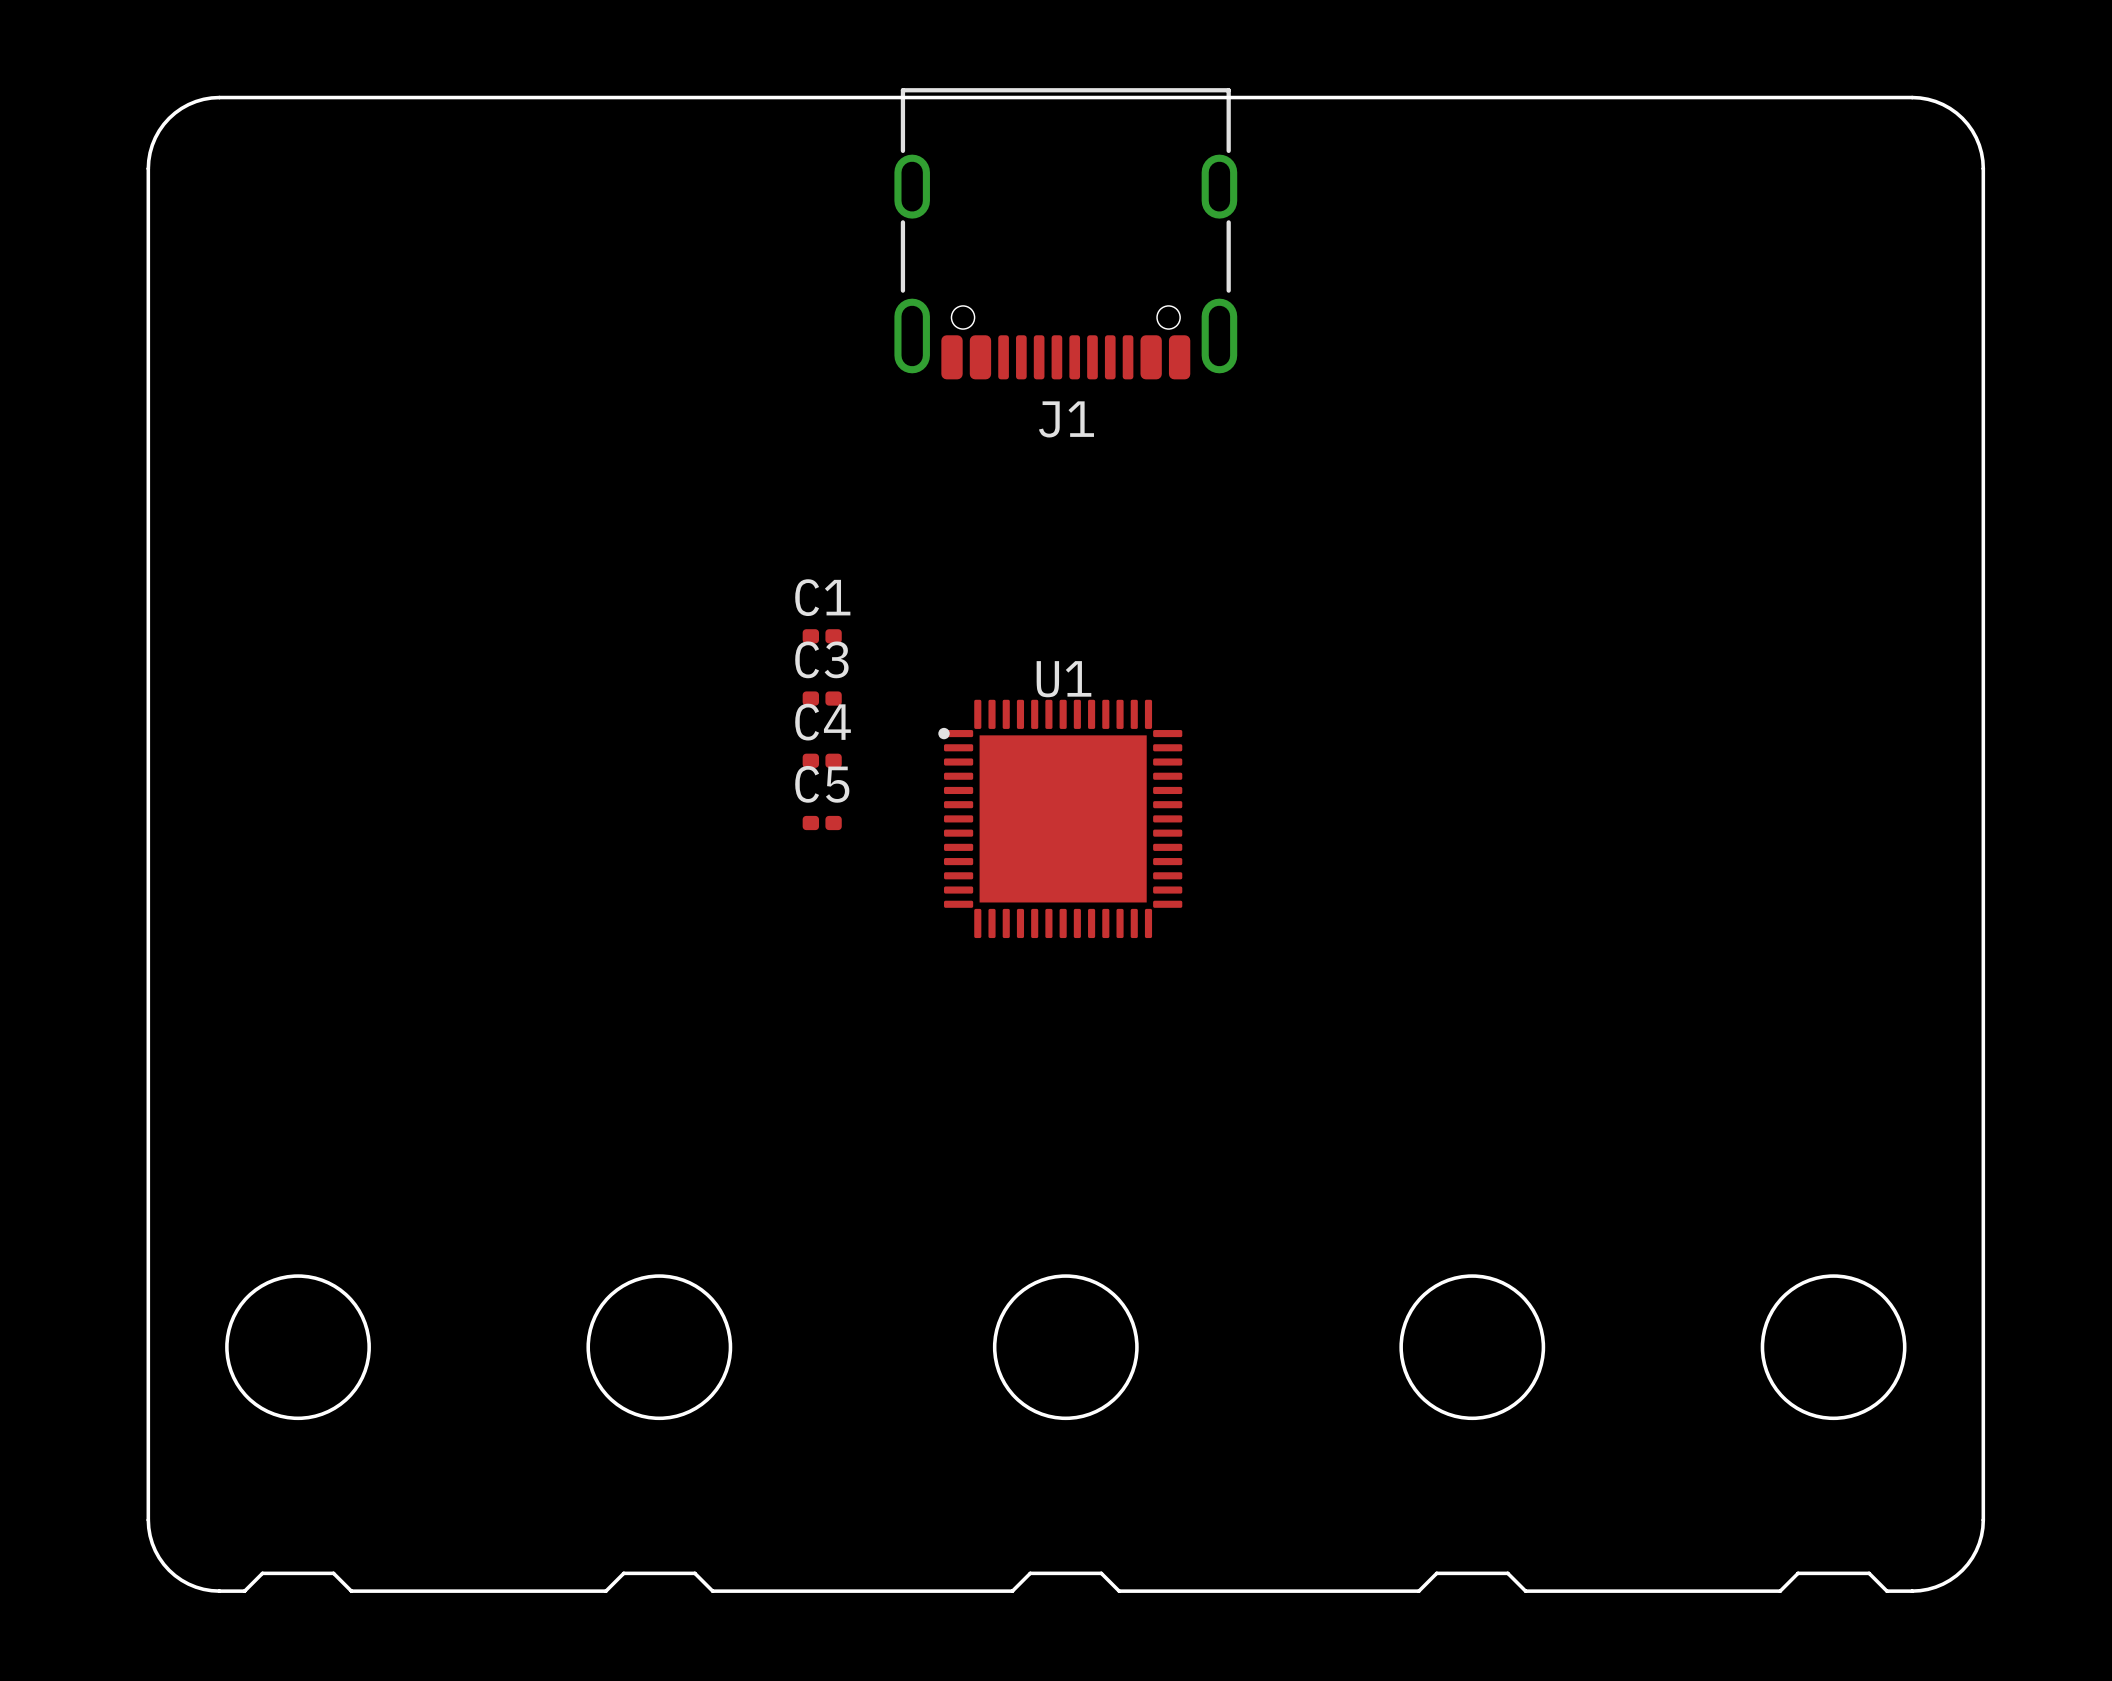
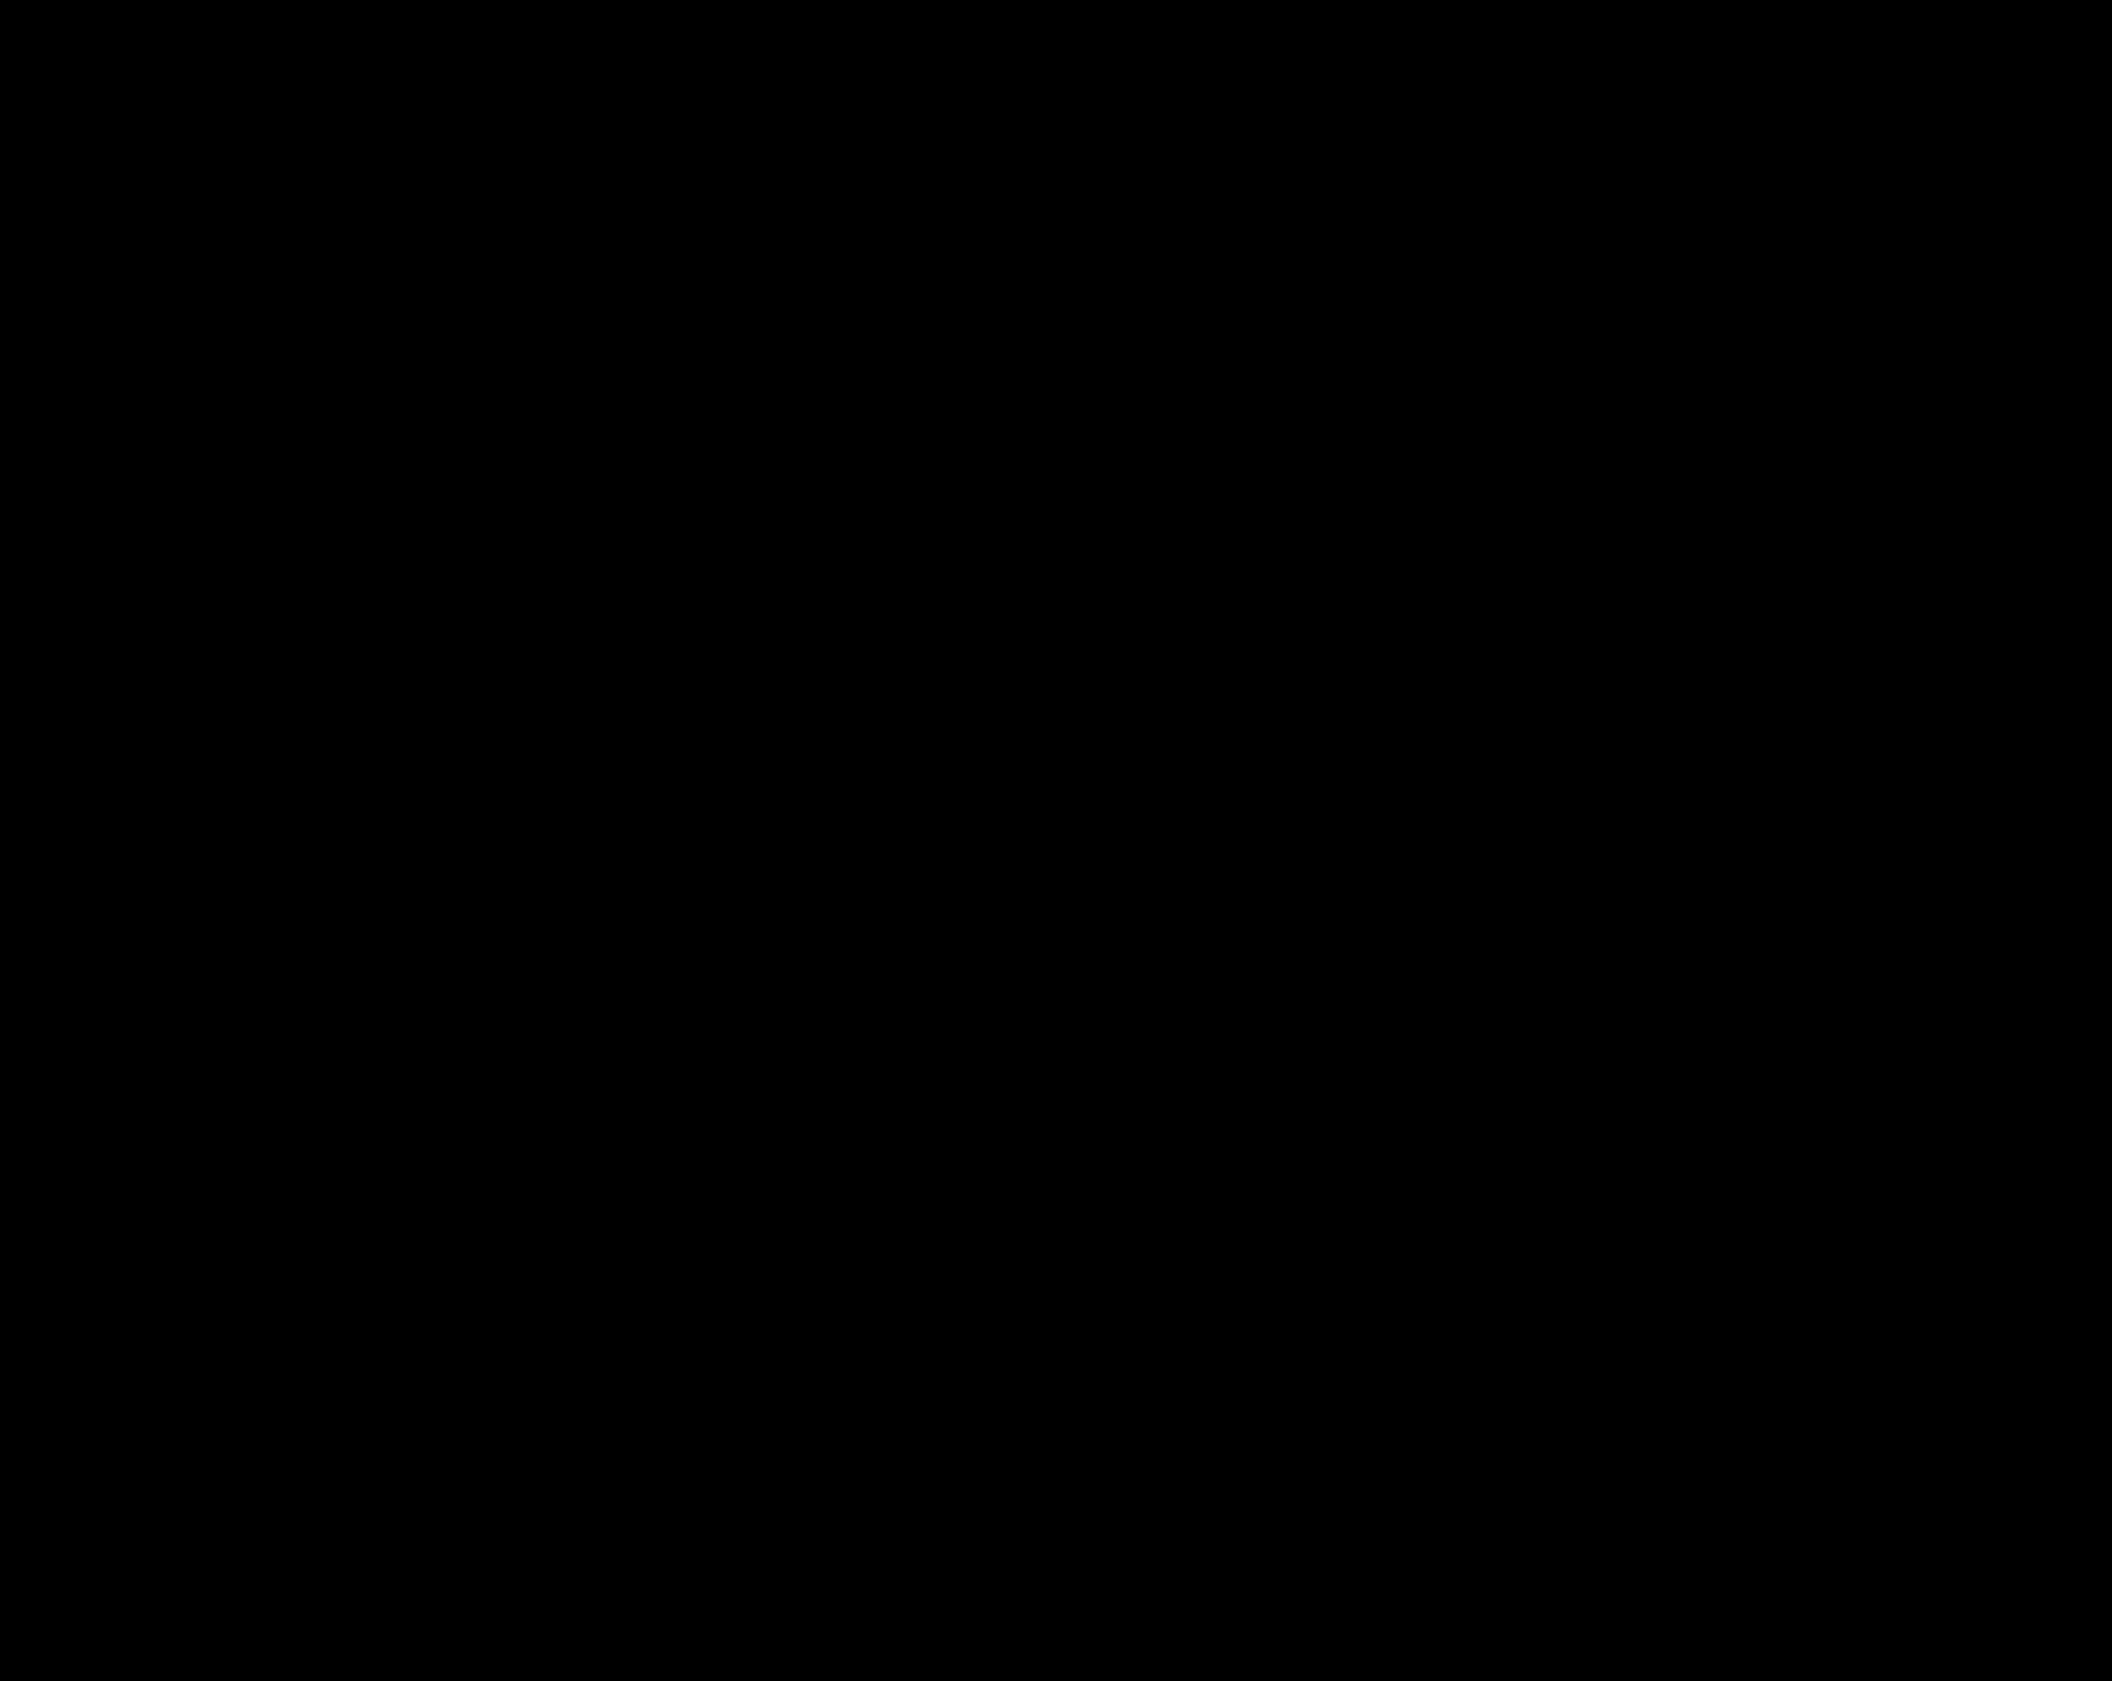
board edge: (219, 97) (1912, 97) (1935, 101) (1956, 113) (1967, 124) (1976, 137) (1981, 152) (1983, 168) (1983, 1520) (1979, 1543) (1967, 1564) (1956, 1575) (1943, 1584) (1928, 1589) (1912, 1591) (1886, 1591) (1869, 1573) (1798, 1573) (1780, 1591) (1525, 1591) (1507, 1573) (1436, 1573) (1418, 1591) (1119, 1591) (1101, 1573) (1030, 1573) (1012, 1591) (712, 1591) (694, 1573) (623, 1573) (605, 1591) (351, 1591) (333, 1573) (262, 1573) (244, 1591) (219, 1591) (195, 1587) (175, 1575) (163, 1564) (155, 1550) (150, 1535) (148, 1520) (148, 168) (152, 145) (159, 130) (169, 118) (188, 104) (203, 99) (219, 97) -> none
J1: (1065, 233) -> none
C1: (822, 636) -> none
C3: (822, 698) -> none
C4: (822, 760) -> none
U1: (1060, 818) -> none
C5: (822, 823) -> none
round board edge: [225, 1274, 371, 1421] -> none
round board edge: [586, 1274, 733, 1421] -> none
round board edge: [992, 1274, 1139, 1421] -> none
round board edge: [1399, 1274, 1546, 1421] -> none
round board edge: [1760, 1274, 1907, 1421] -> none

